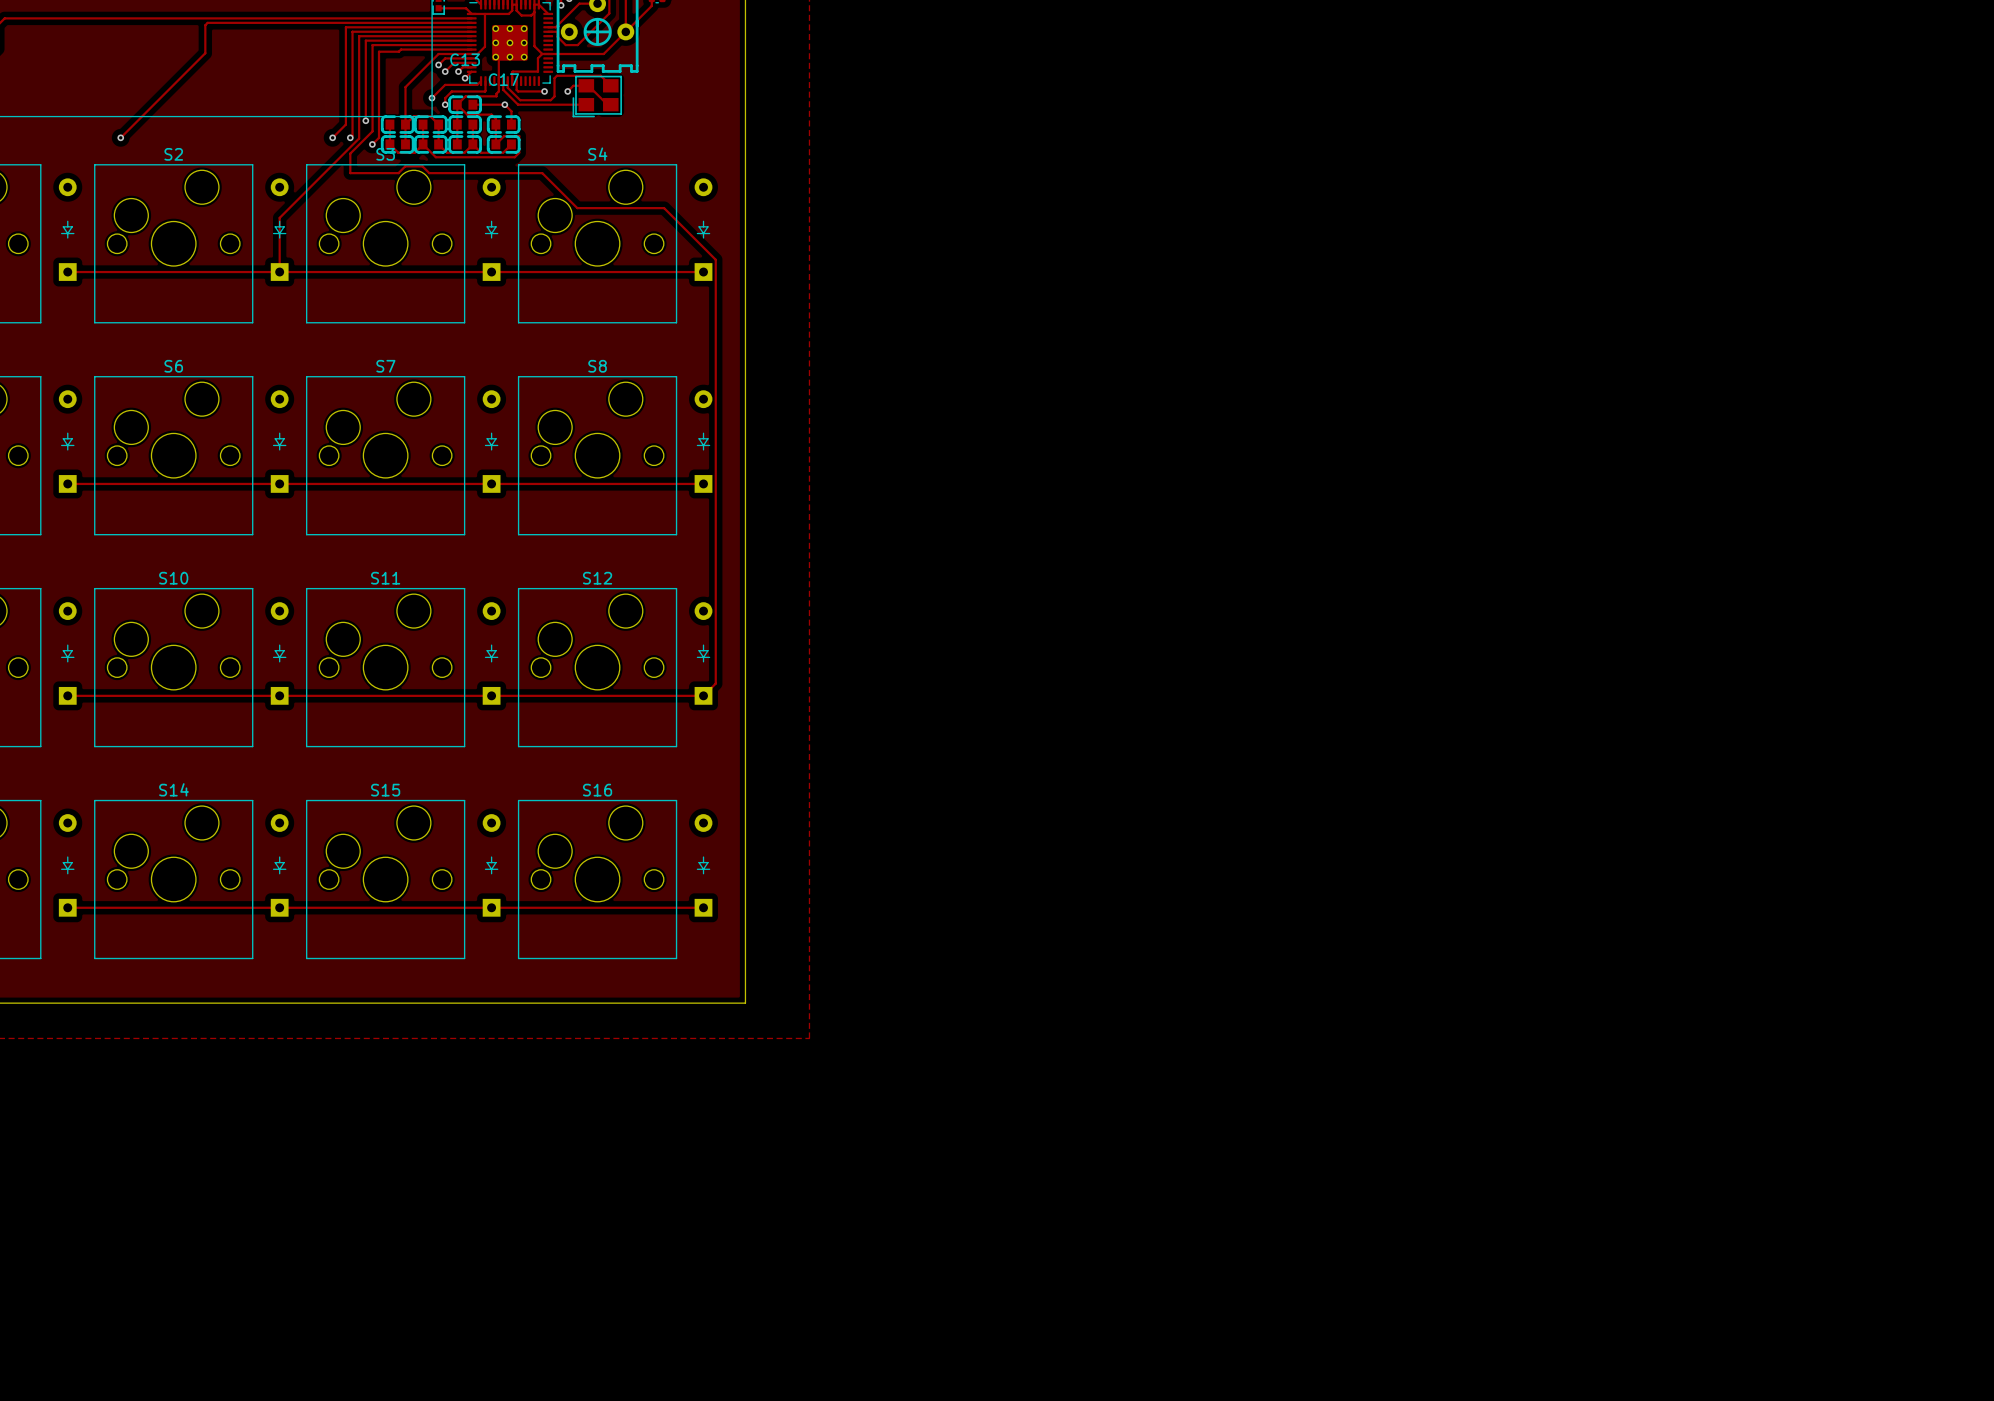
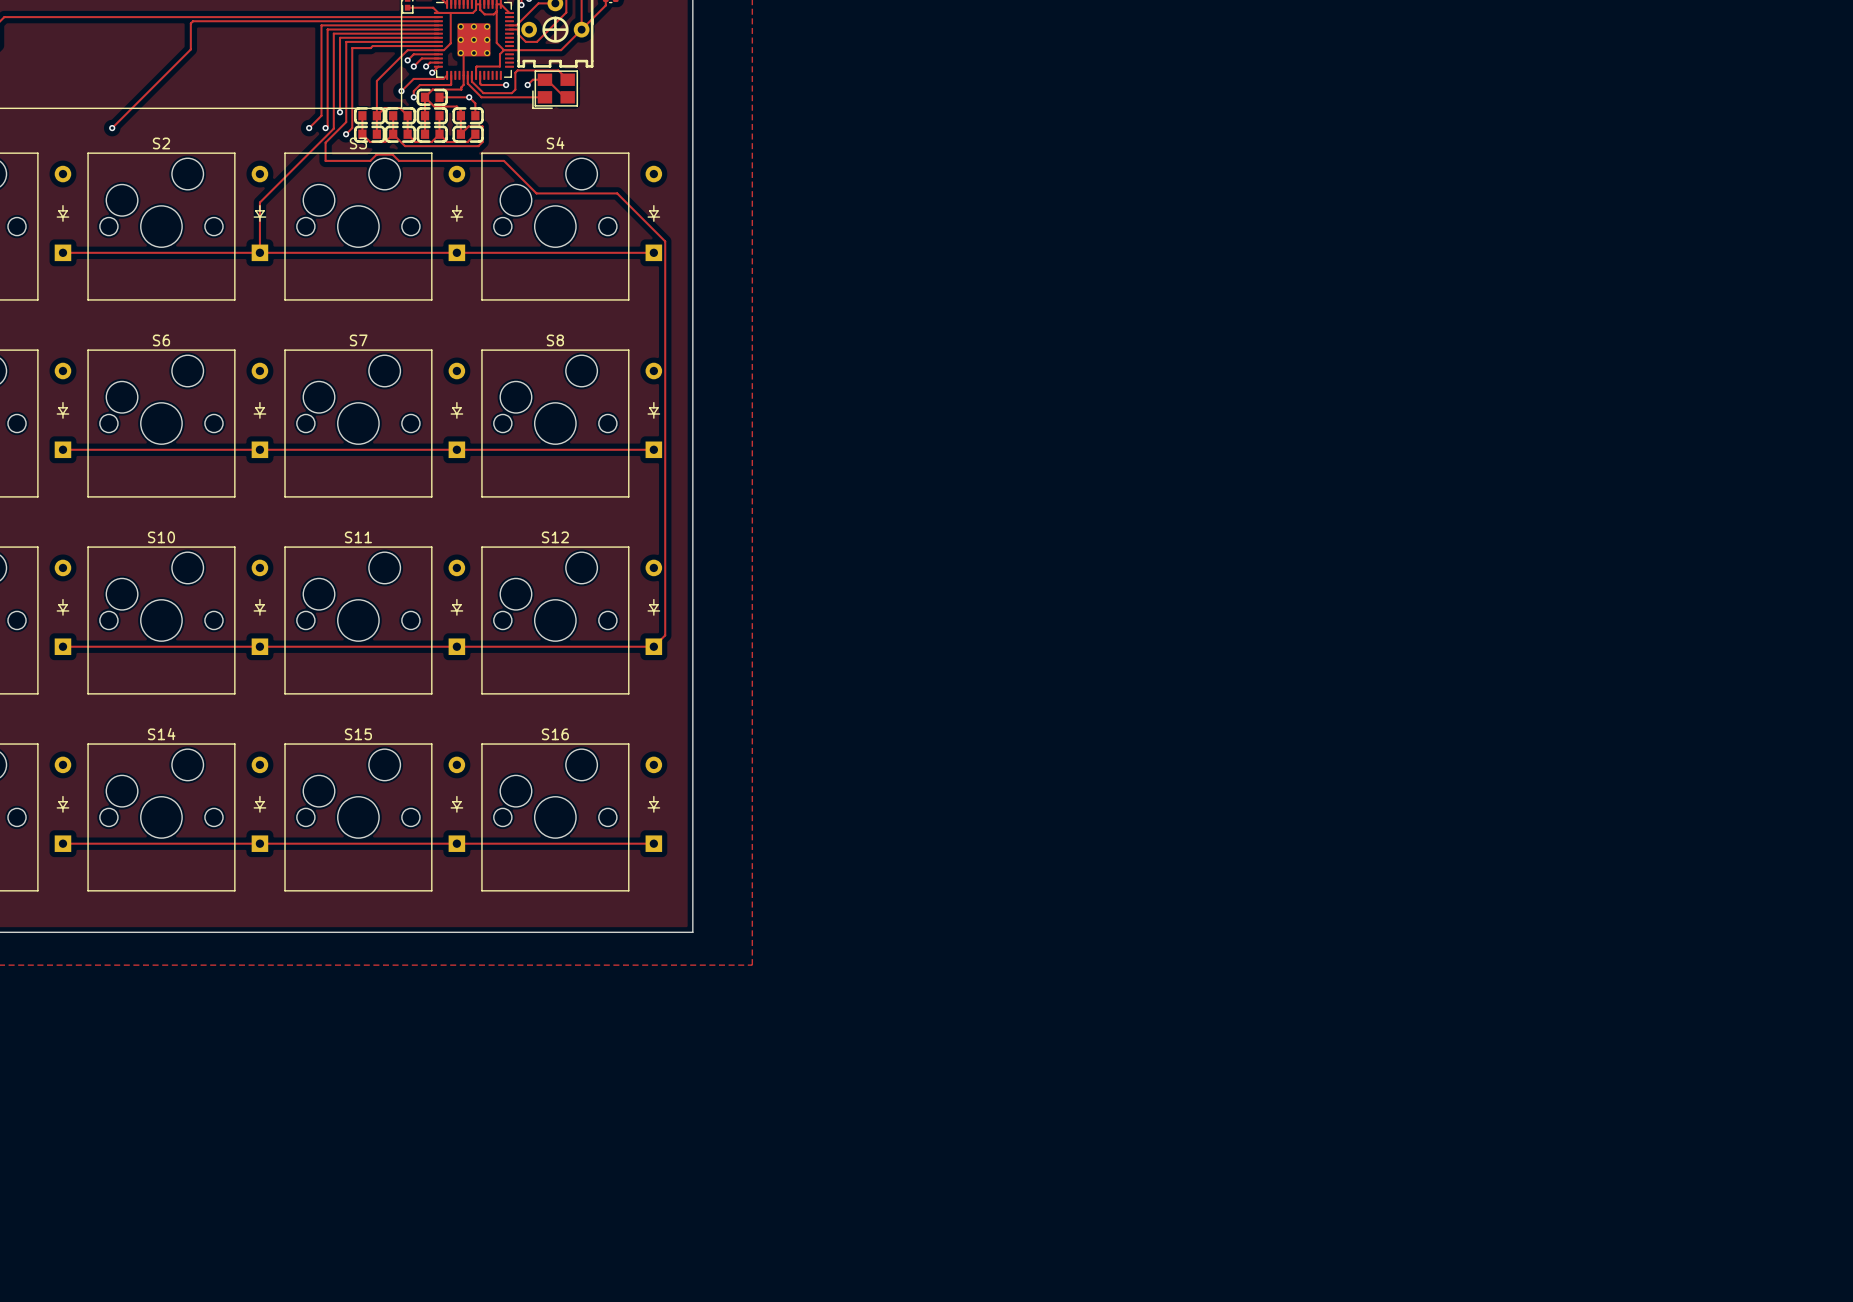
C13 name: C13 (465, 59) -> none
C17 name: C17 (503, 79) -> none

